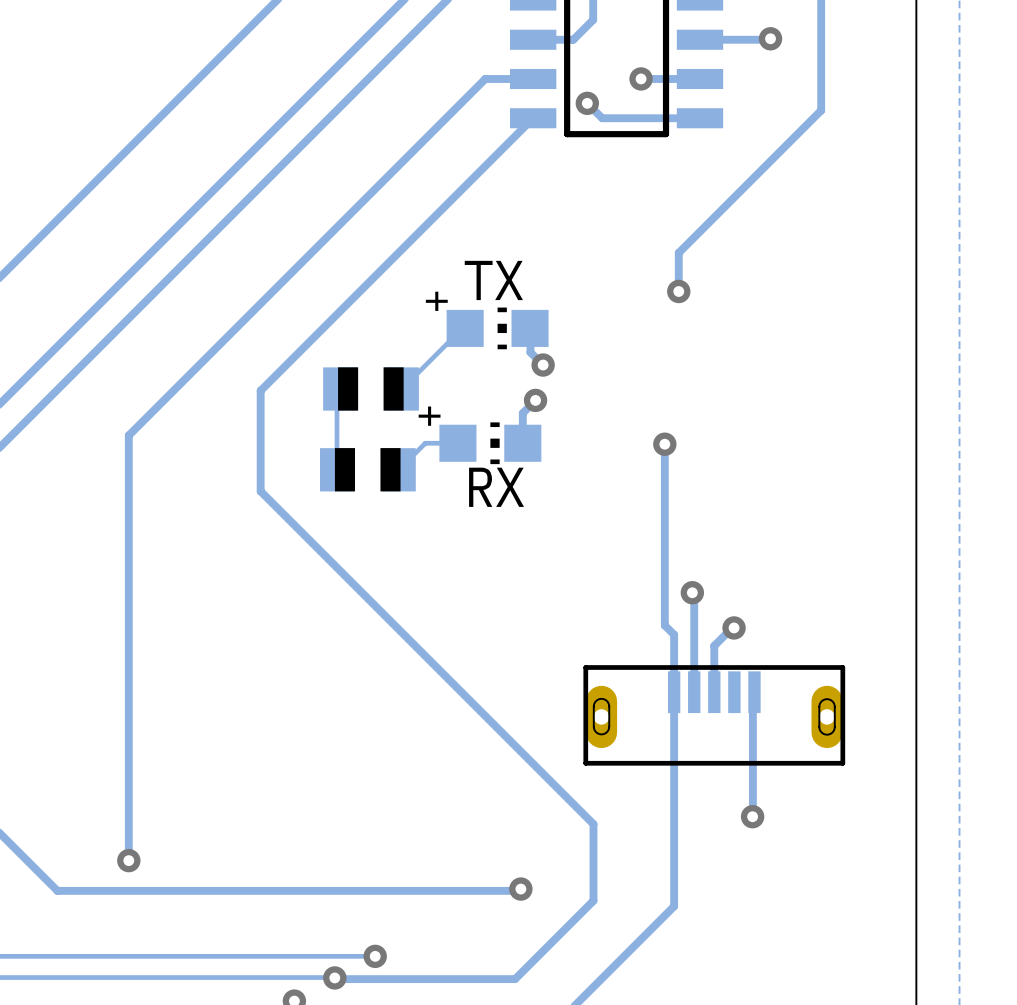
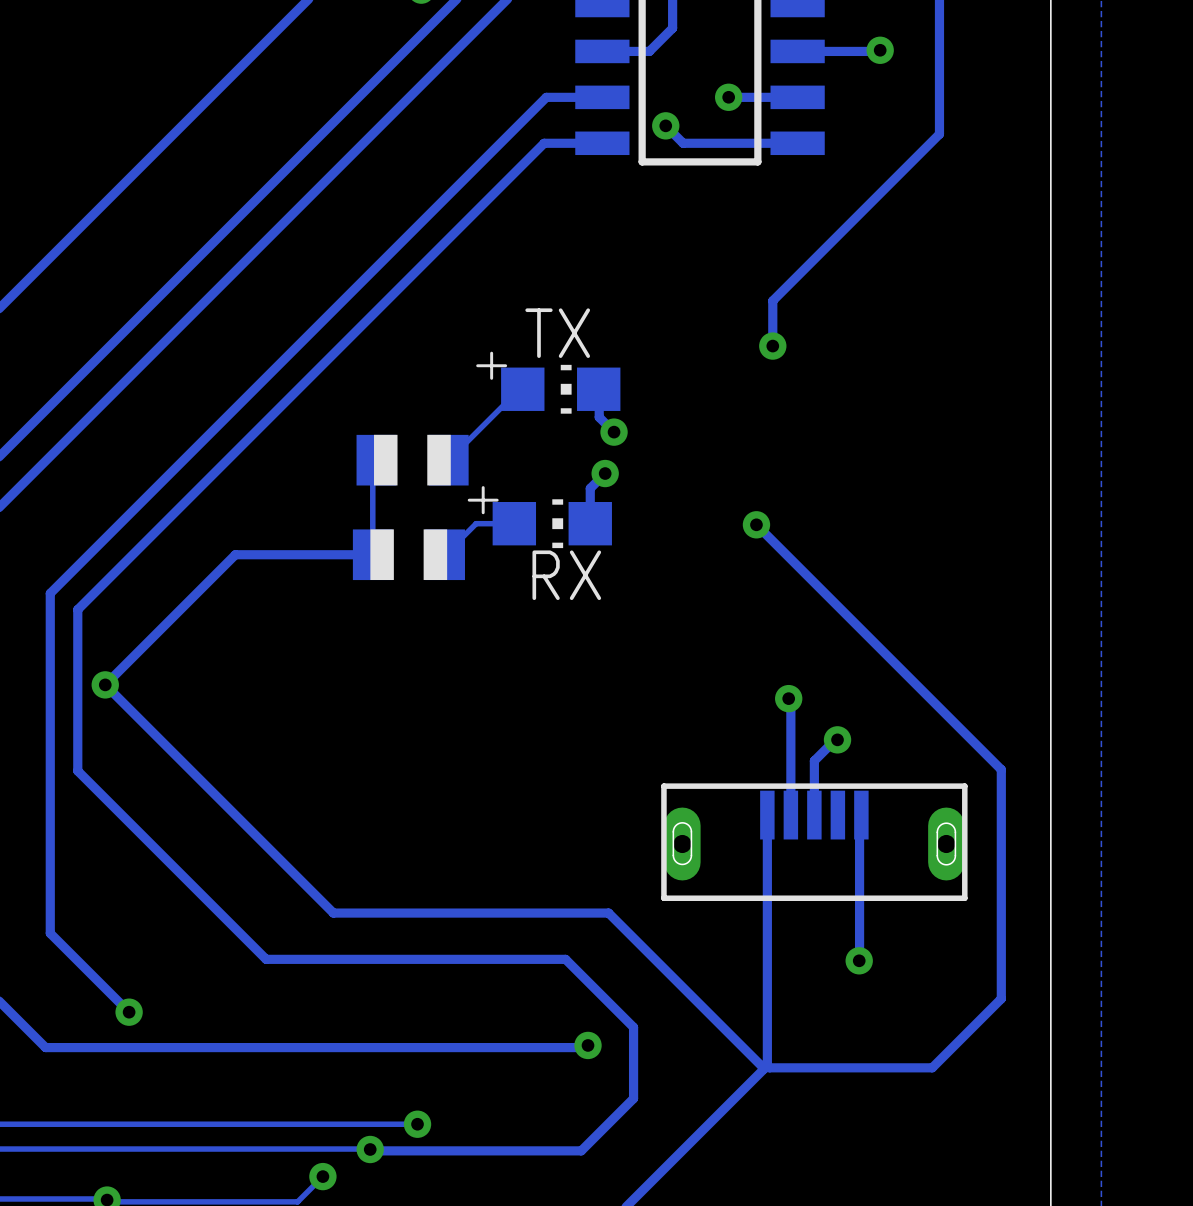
track: (533, 118) (260, 390) (260, 491) (593, 824) (593, 900) (559, 934) -> (602, 143) (544, 143) (77, 609) (77, 770) (266, 959) (565, 959) (633, 1027) (633, 1098)
track: (128, 435) (128, 860) -> (129, 514) (50, 593) (50, 933) (129, 1012)
track: (664, 444) (664, 625) (674, 634) (674, 692) -> (756, 524) (1001, 769) (1001, 998) (932, 1067) (769, 1067) (767, 1065)
track: none -> (372, 554) (235, 554) (105, 684) (333, 913) (608, 913) (764, 1068)
via: none -> (105, 684)

